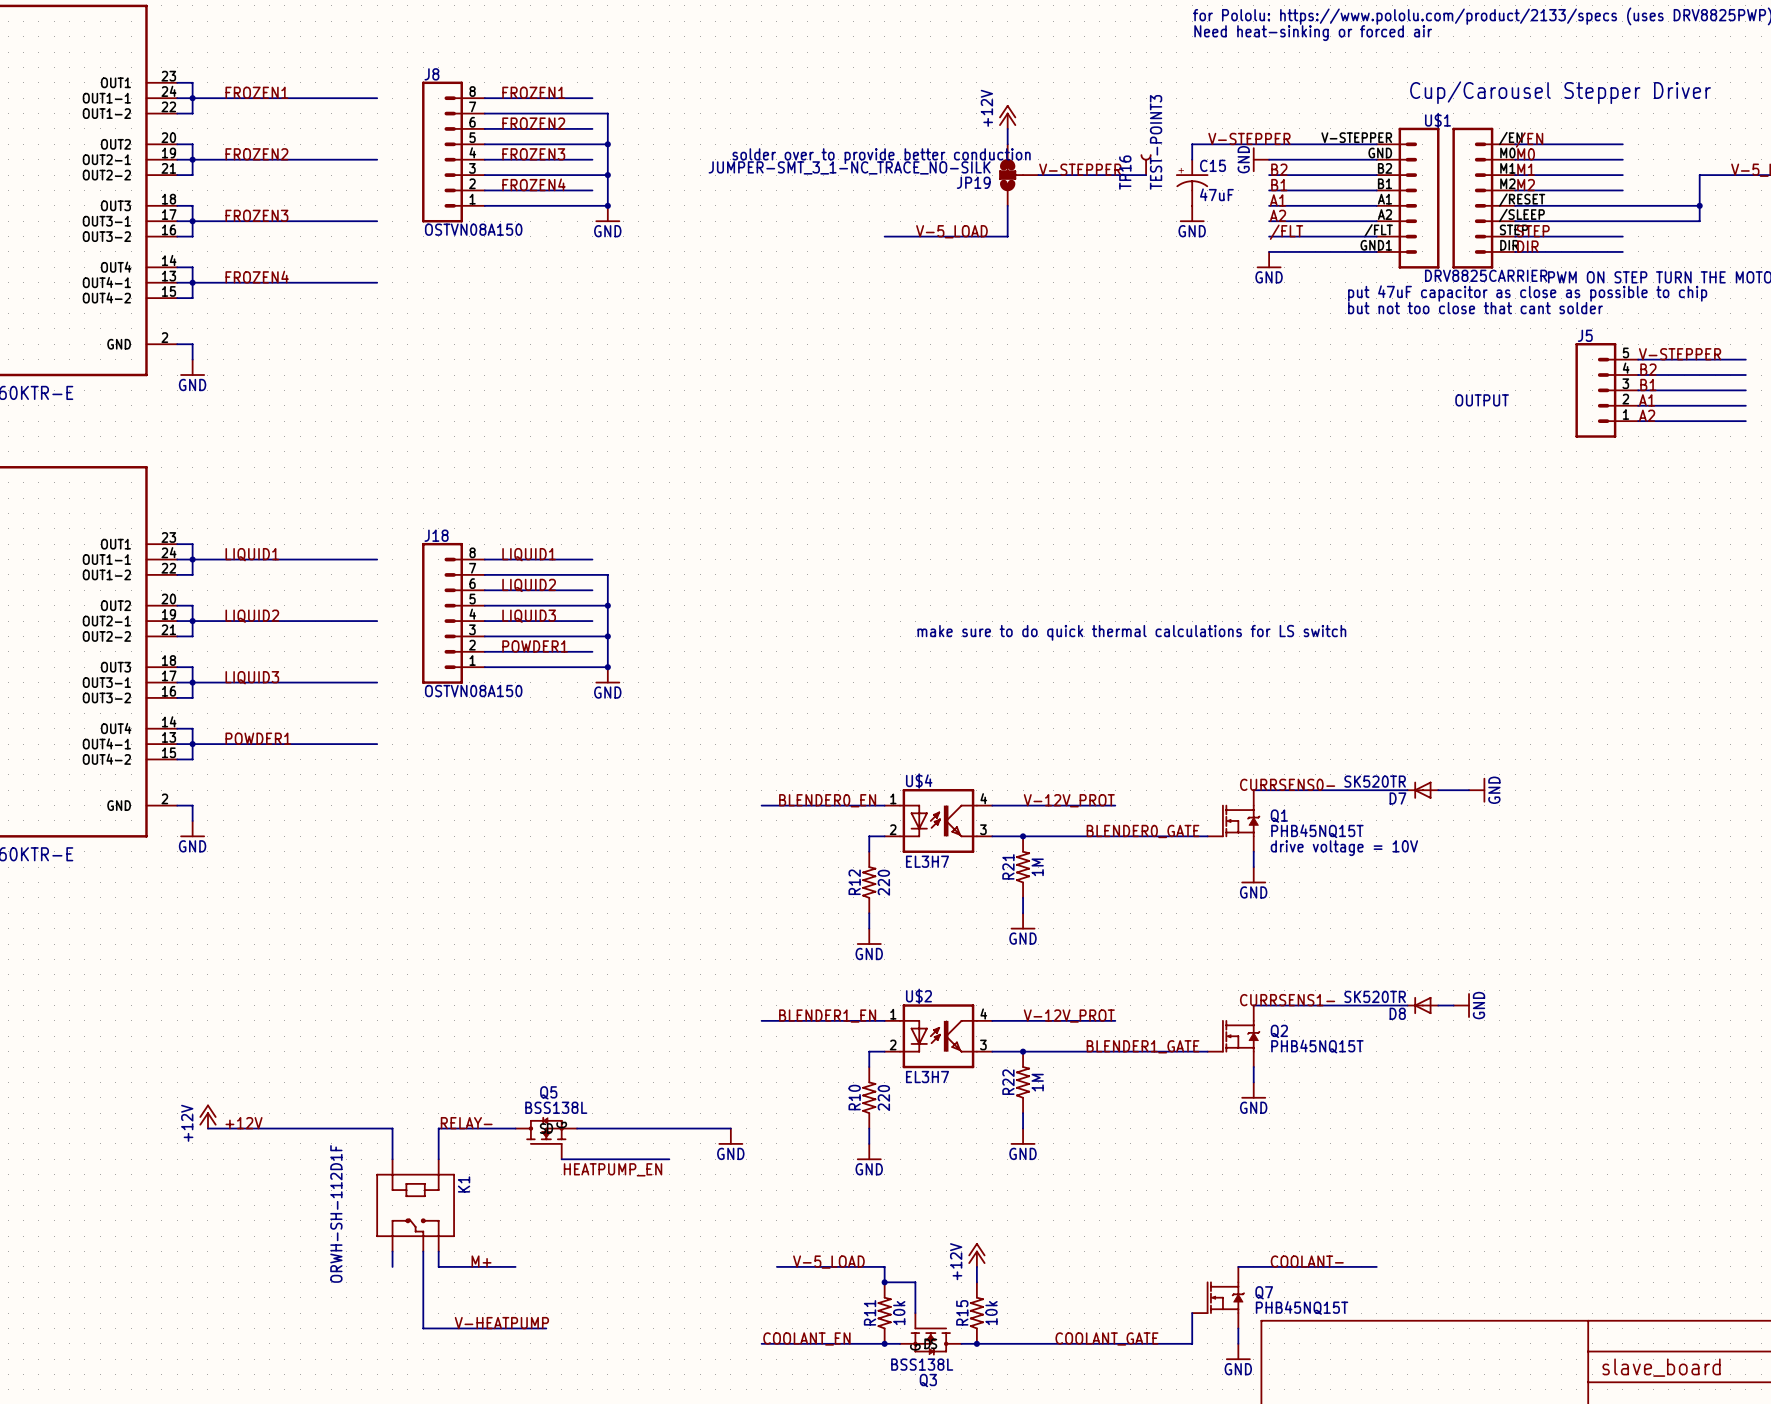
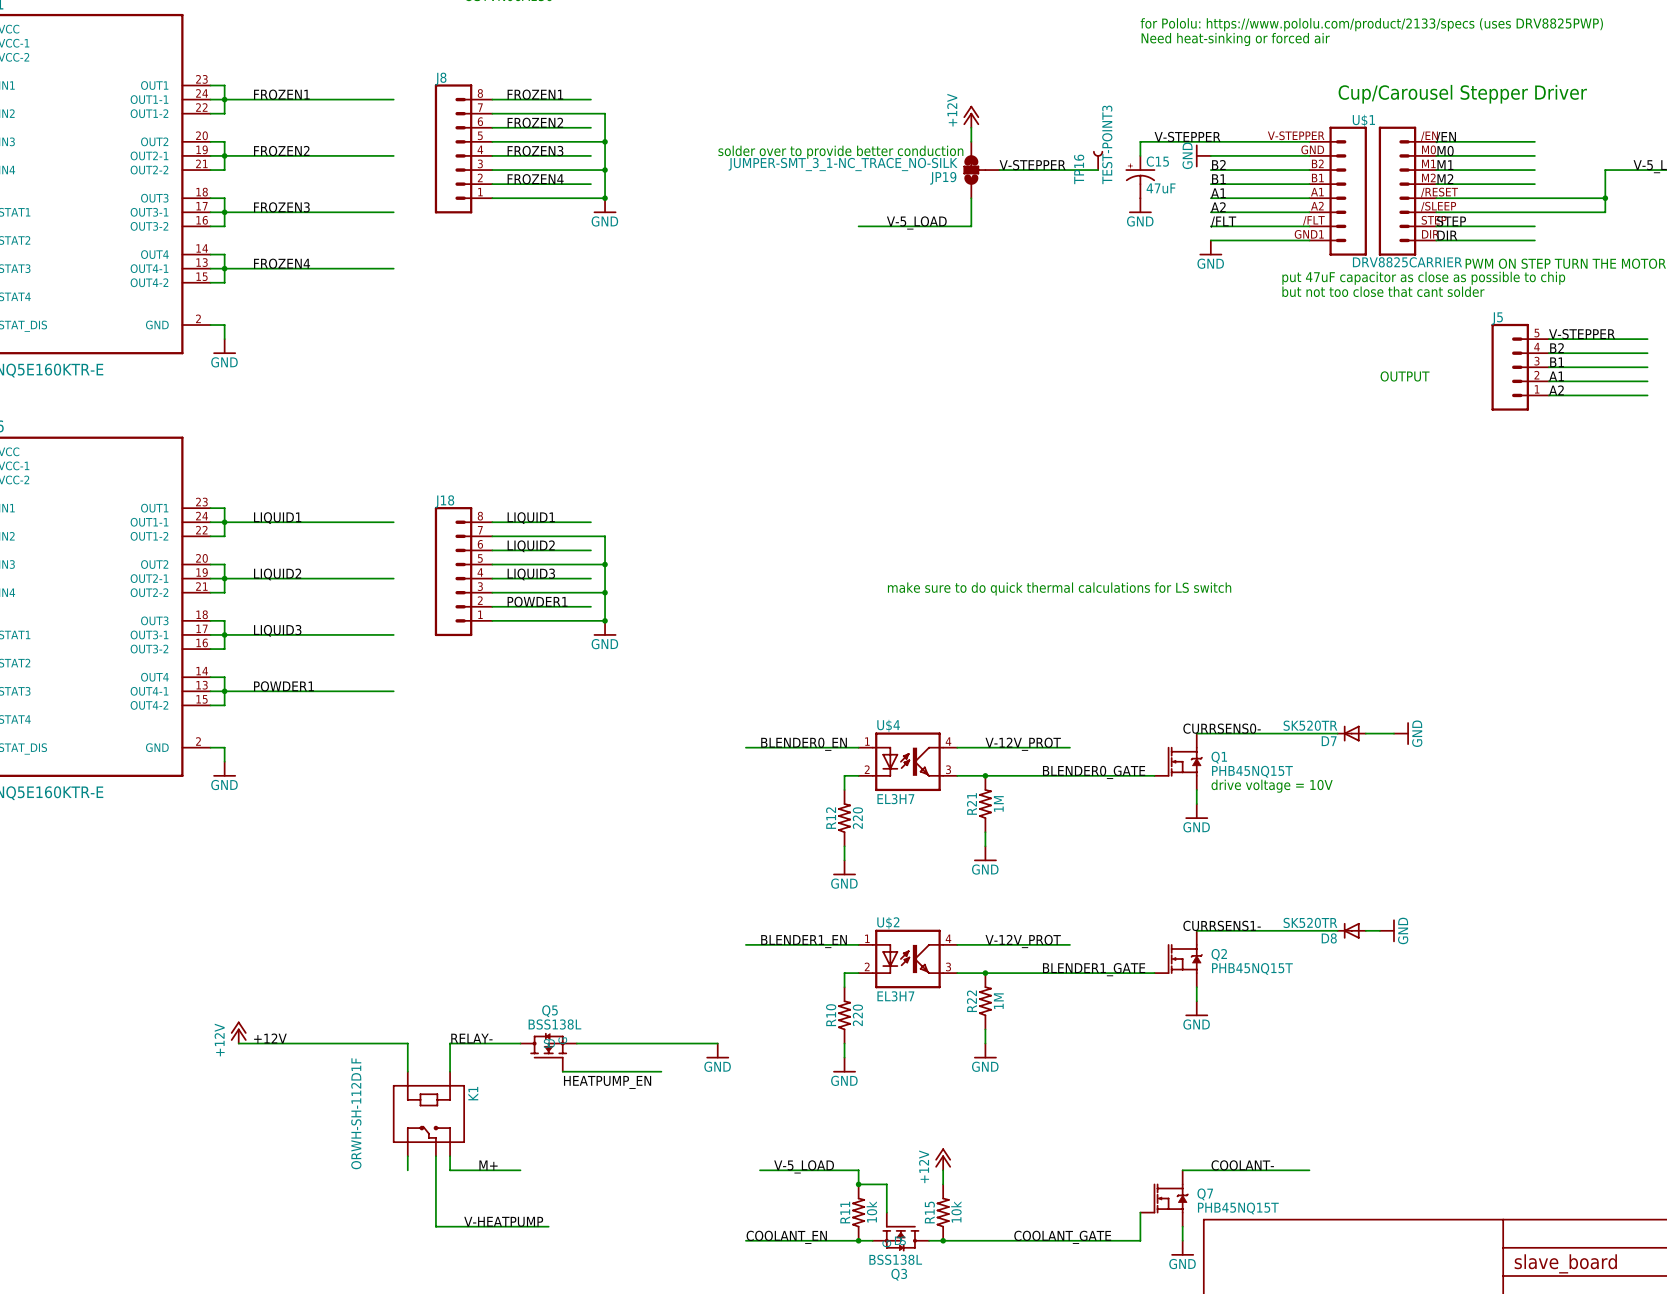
J8 value: OSTVN08A150 (473, 229) -> none
J18 value: OSTVN08A150 (473, 691) -> none

